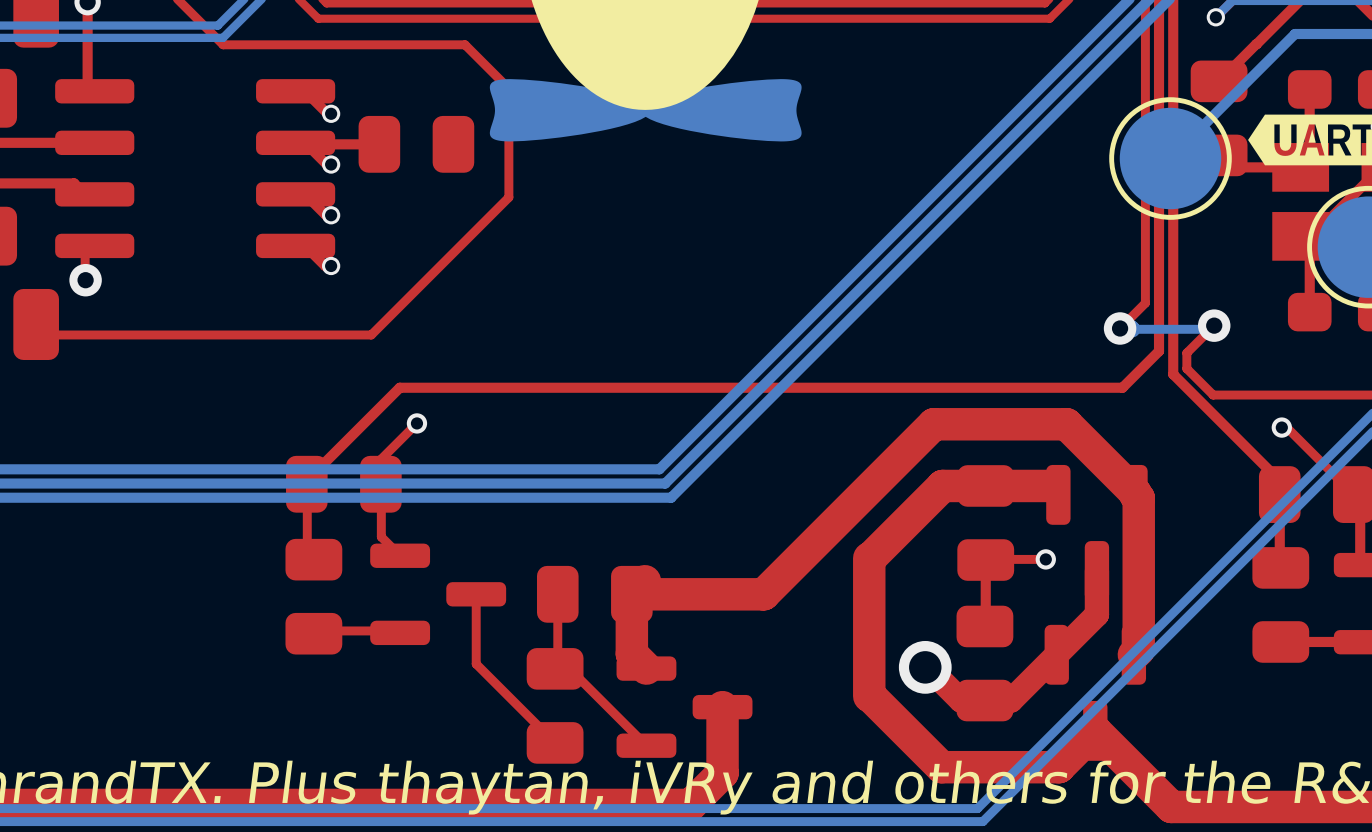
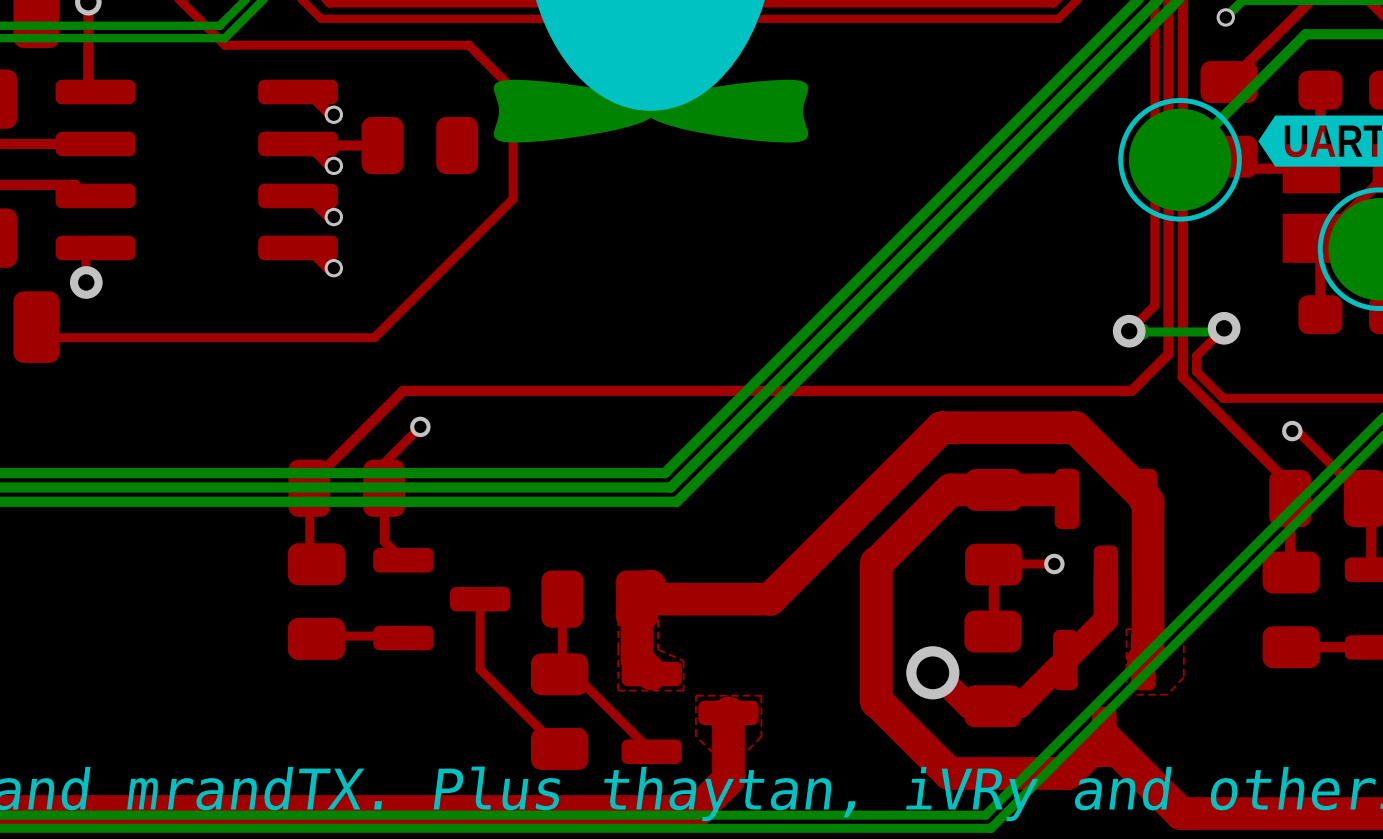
top zone outline: none -> (658, 620) (618, 620) (618, 690) (683, 690) (683, 660) (658, 649) (658, 620)
top zone outline: none -> (1167, 629) (1183, 645) (1183, 677) (1167, 694) (1126, 694) (1126, 629) (1167, 629)
top zone outline: none -> (761, 695) (695, 695) (695, 736) (713, 753) (745, 753) (761, 736) (761, 695)

